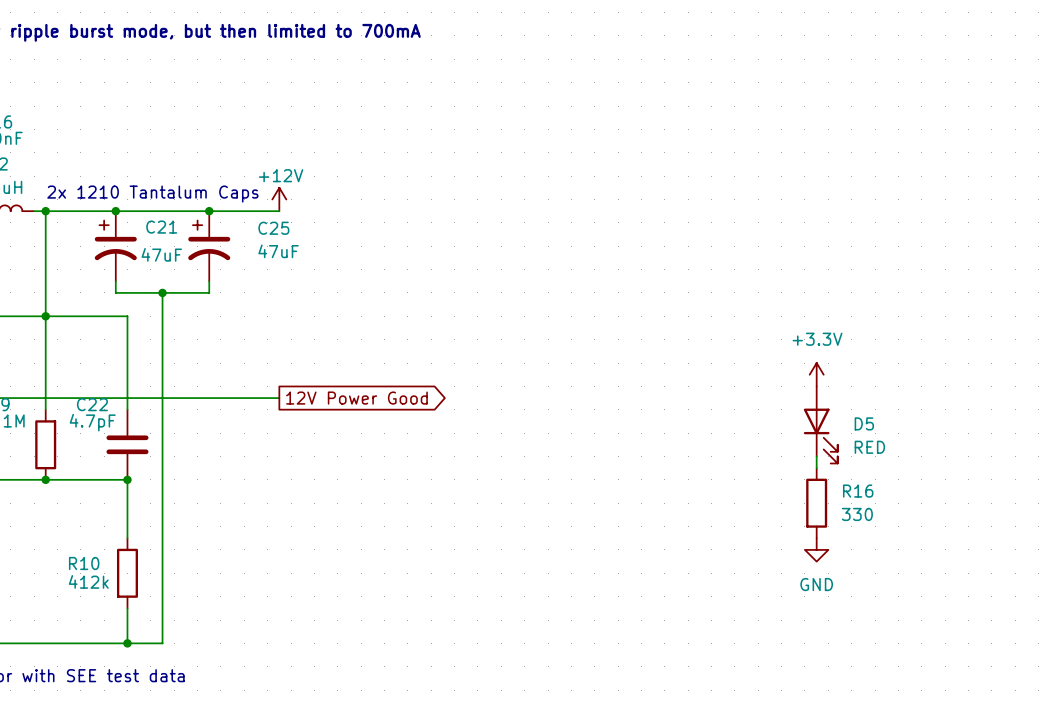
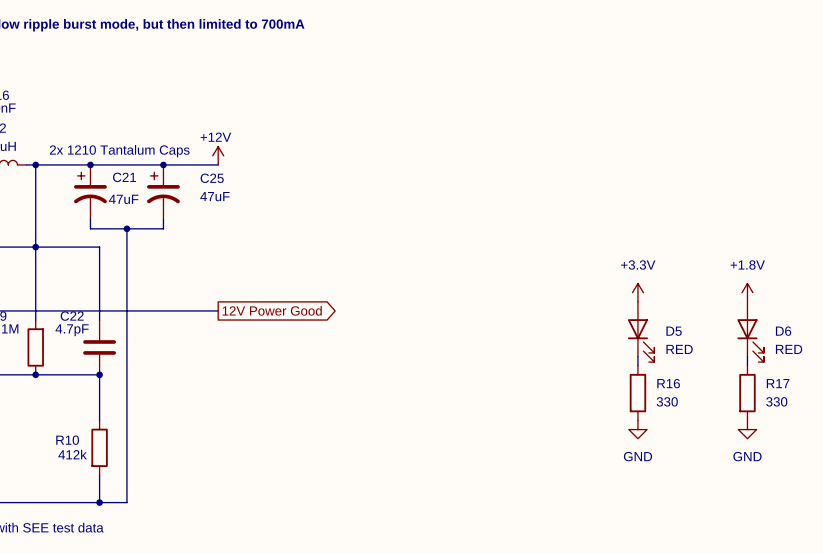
power symbol: none -> +1.8V (747, 292)
D6: none -> RED (750, 331)
wire: none -> (747, 356) (747, 365)
R17: none -> 330 (747, 393)
power symbol: none -> GND (747, 429)

